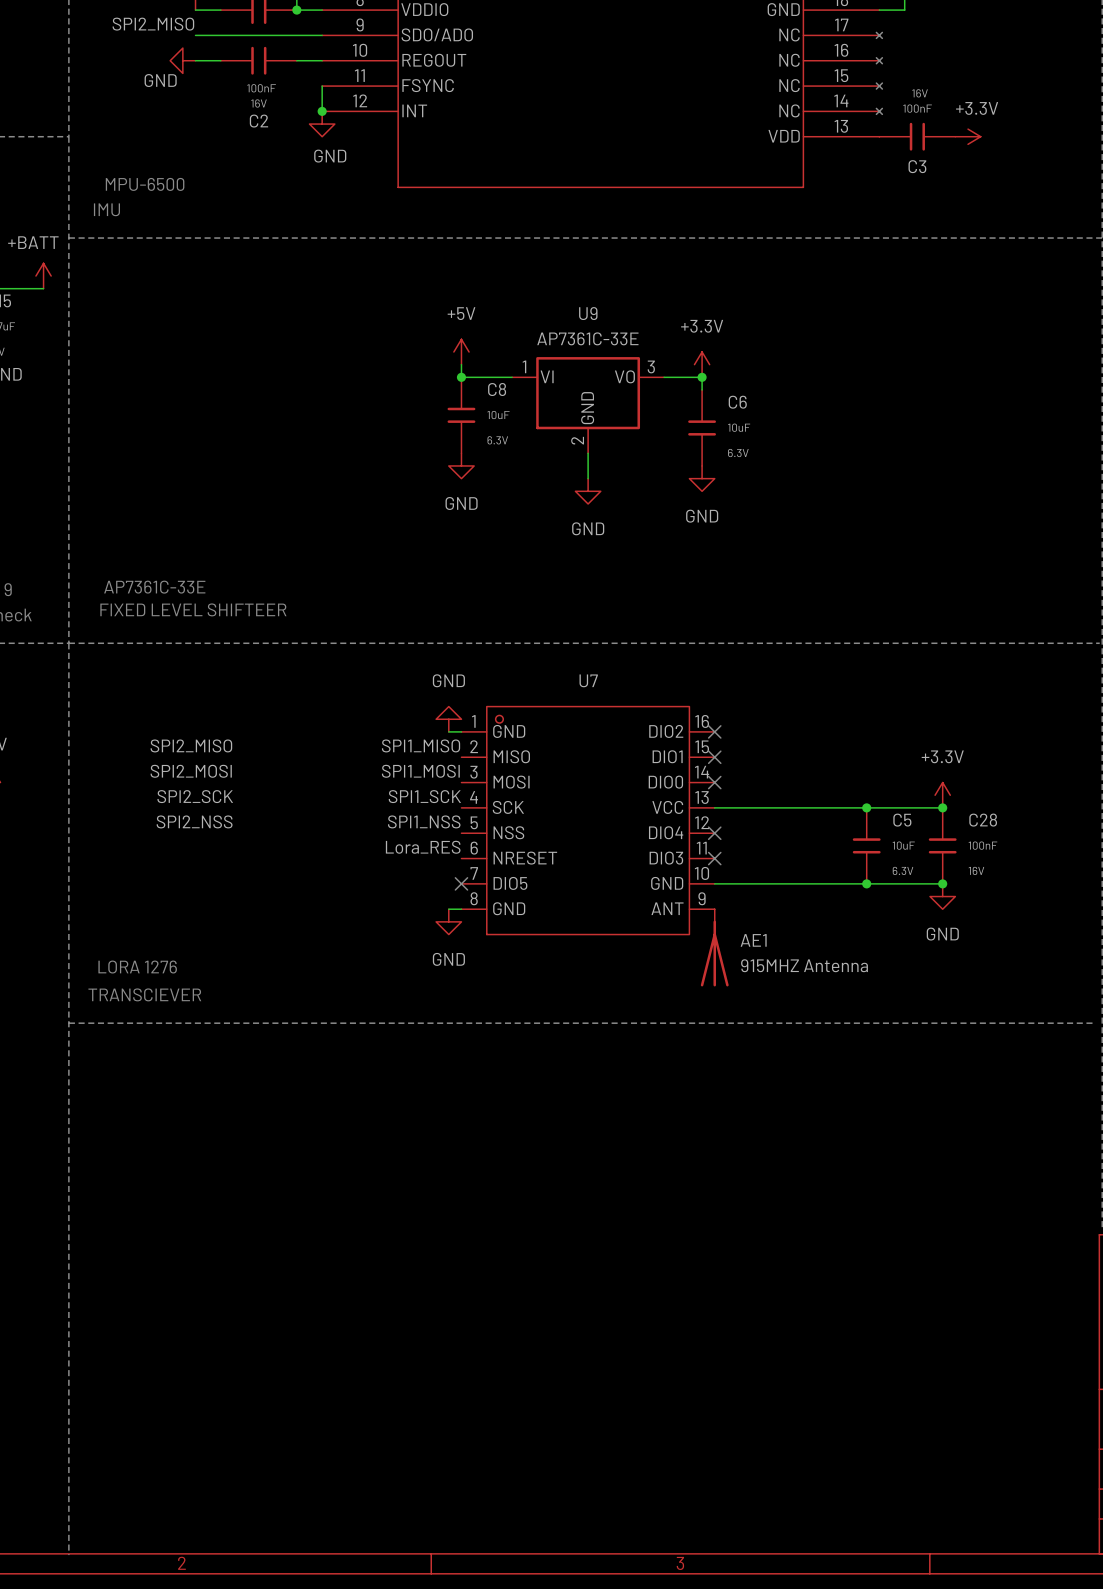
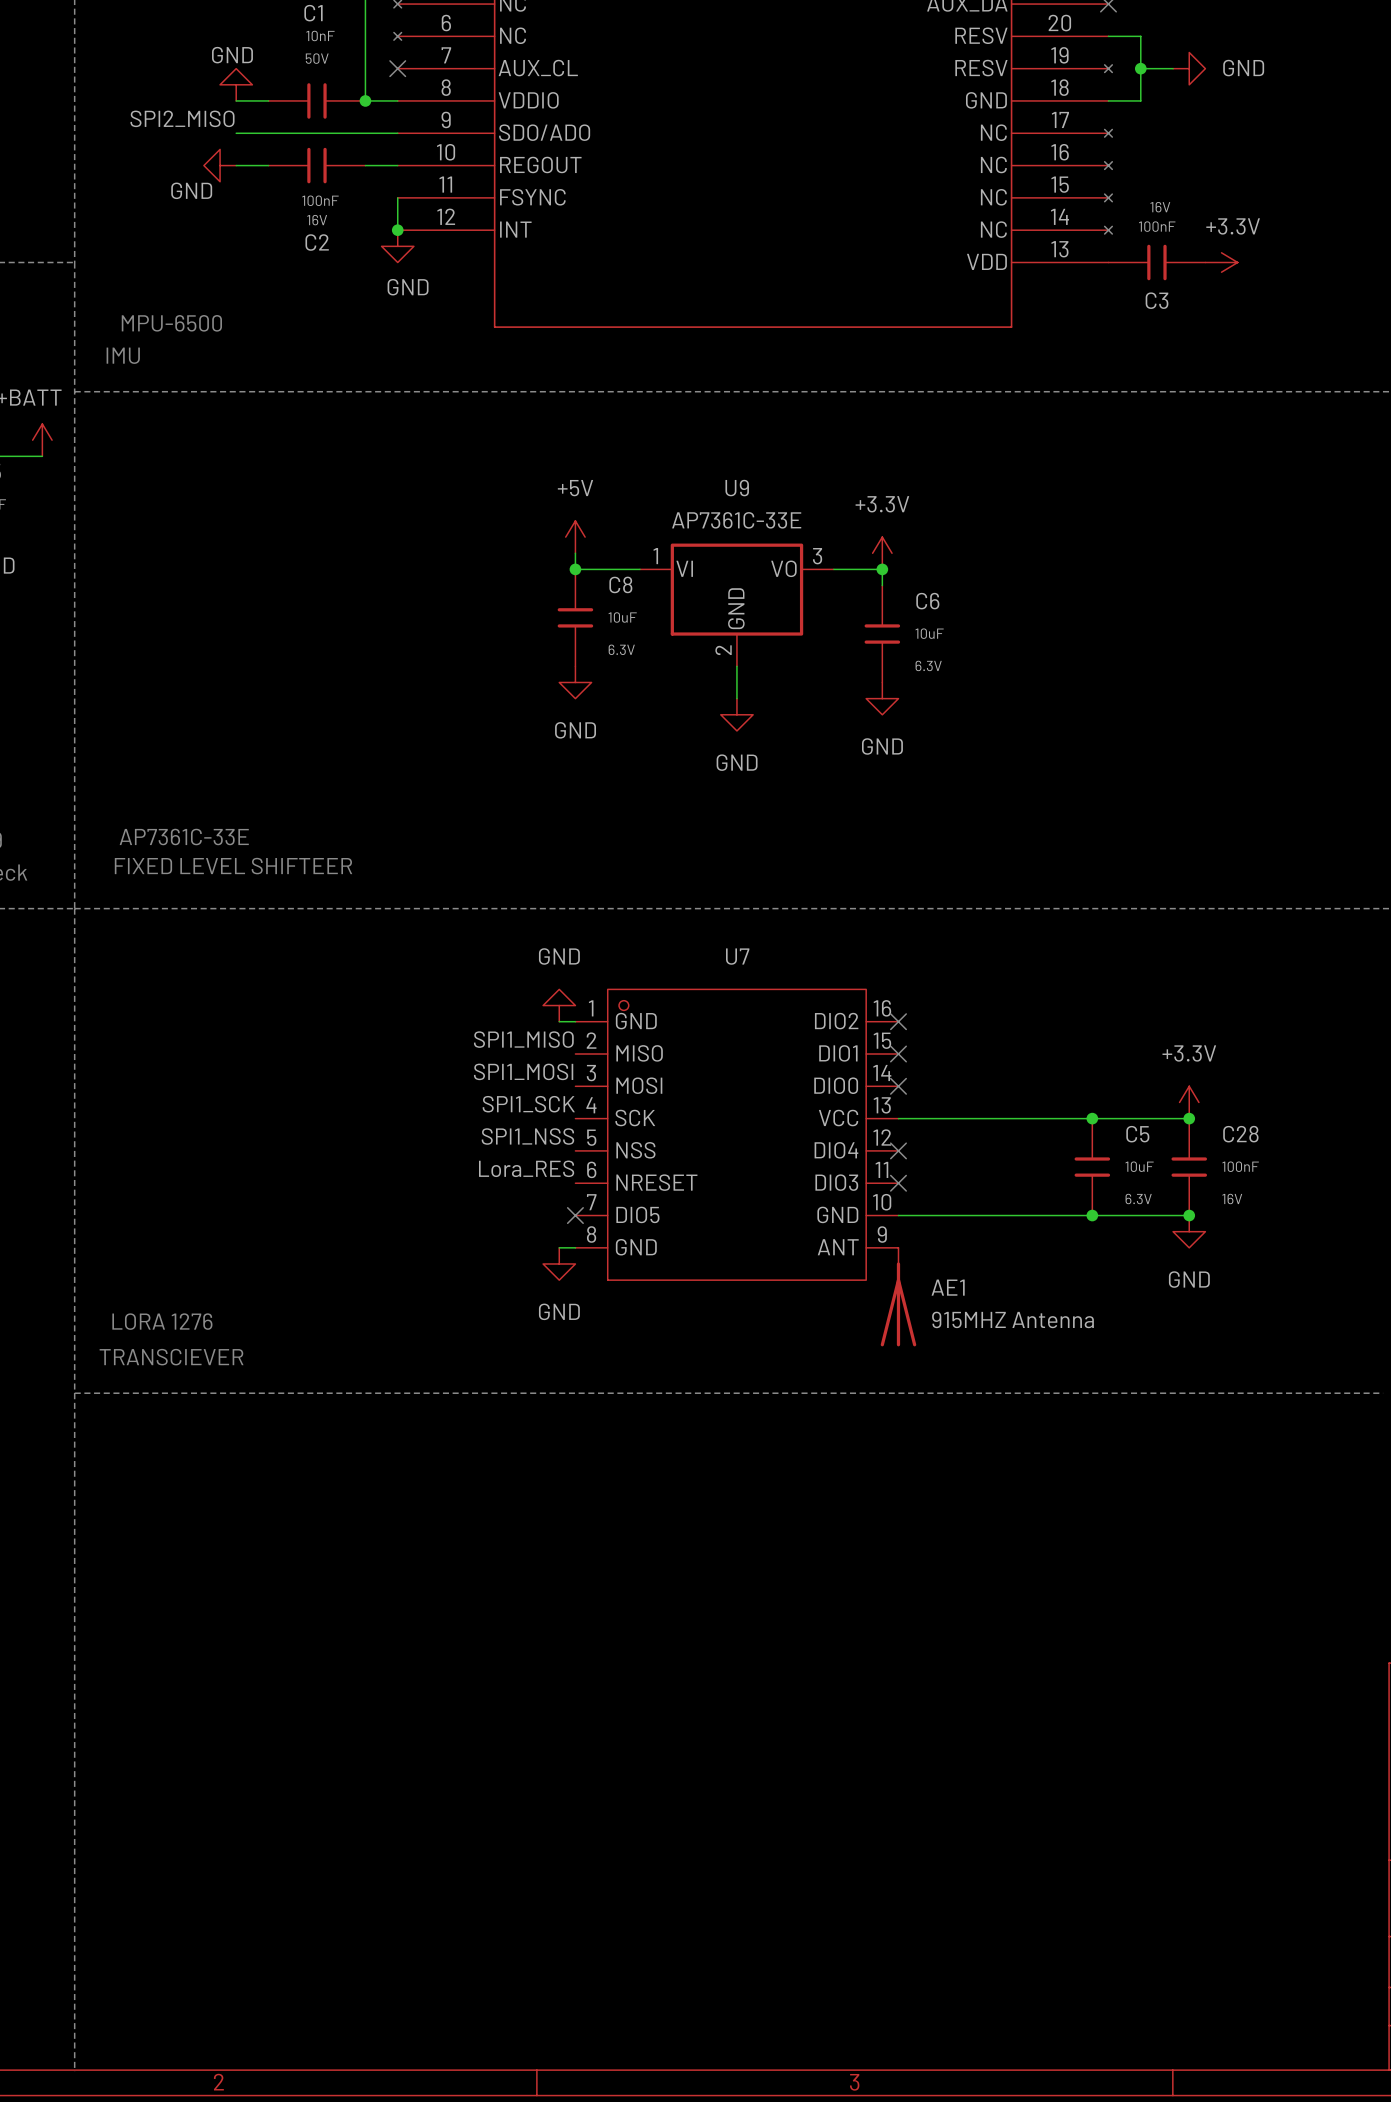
label: SPI2_MISO (191, 745) -> none
label: SPI2_MOSI (191, 771) -> none
label: SPI2_SCK (195, 796) -> none
label: SPI2_NSS (194, 821) -> none

